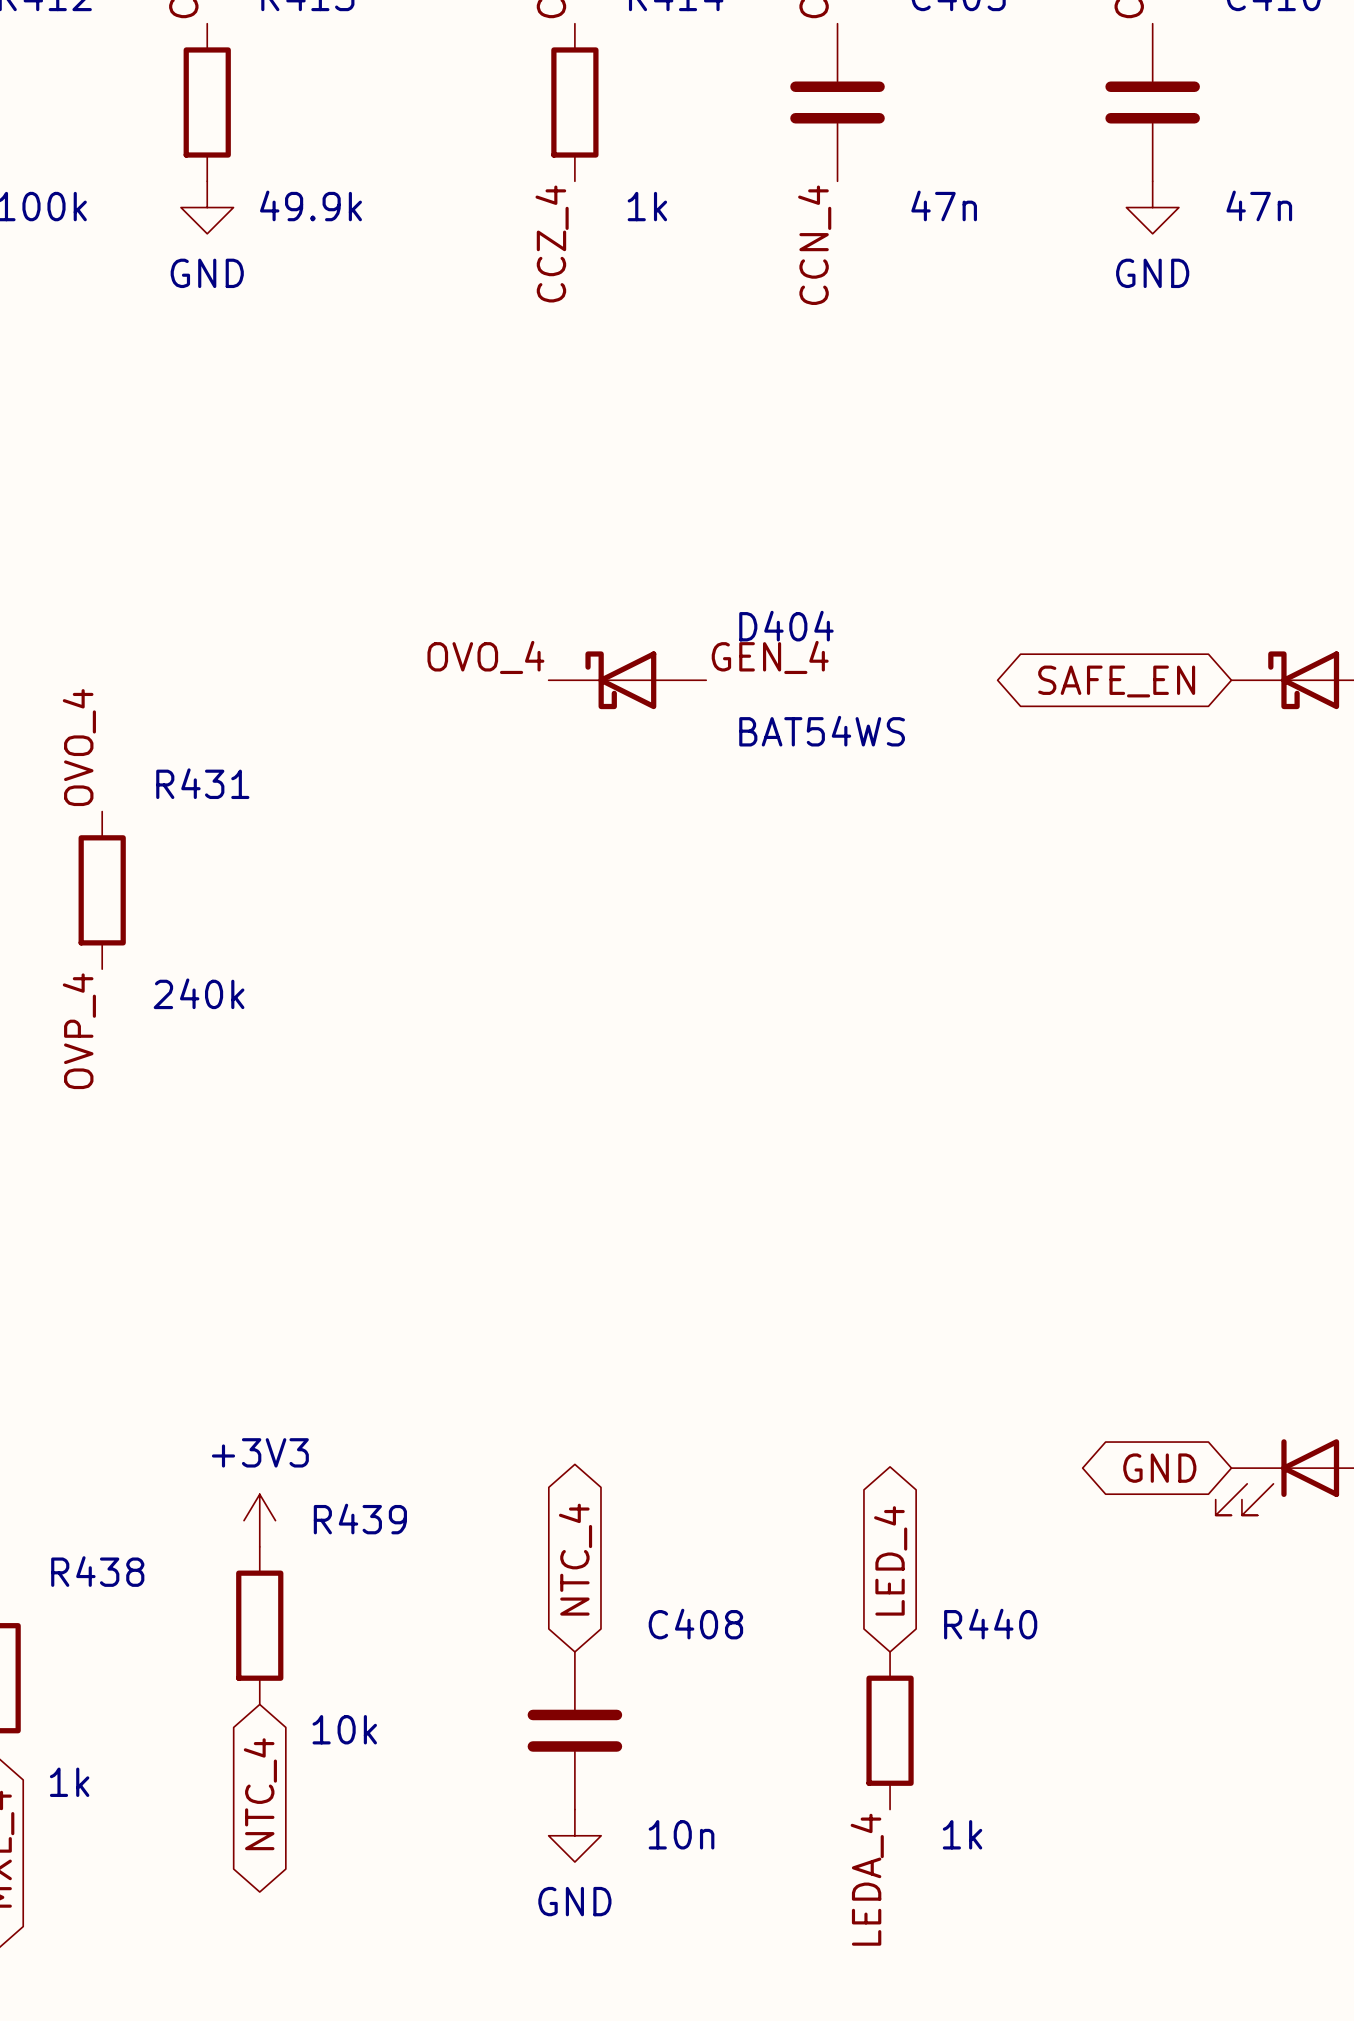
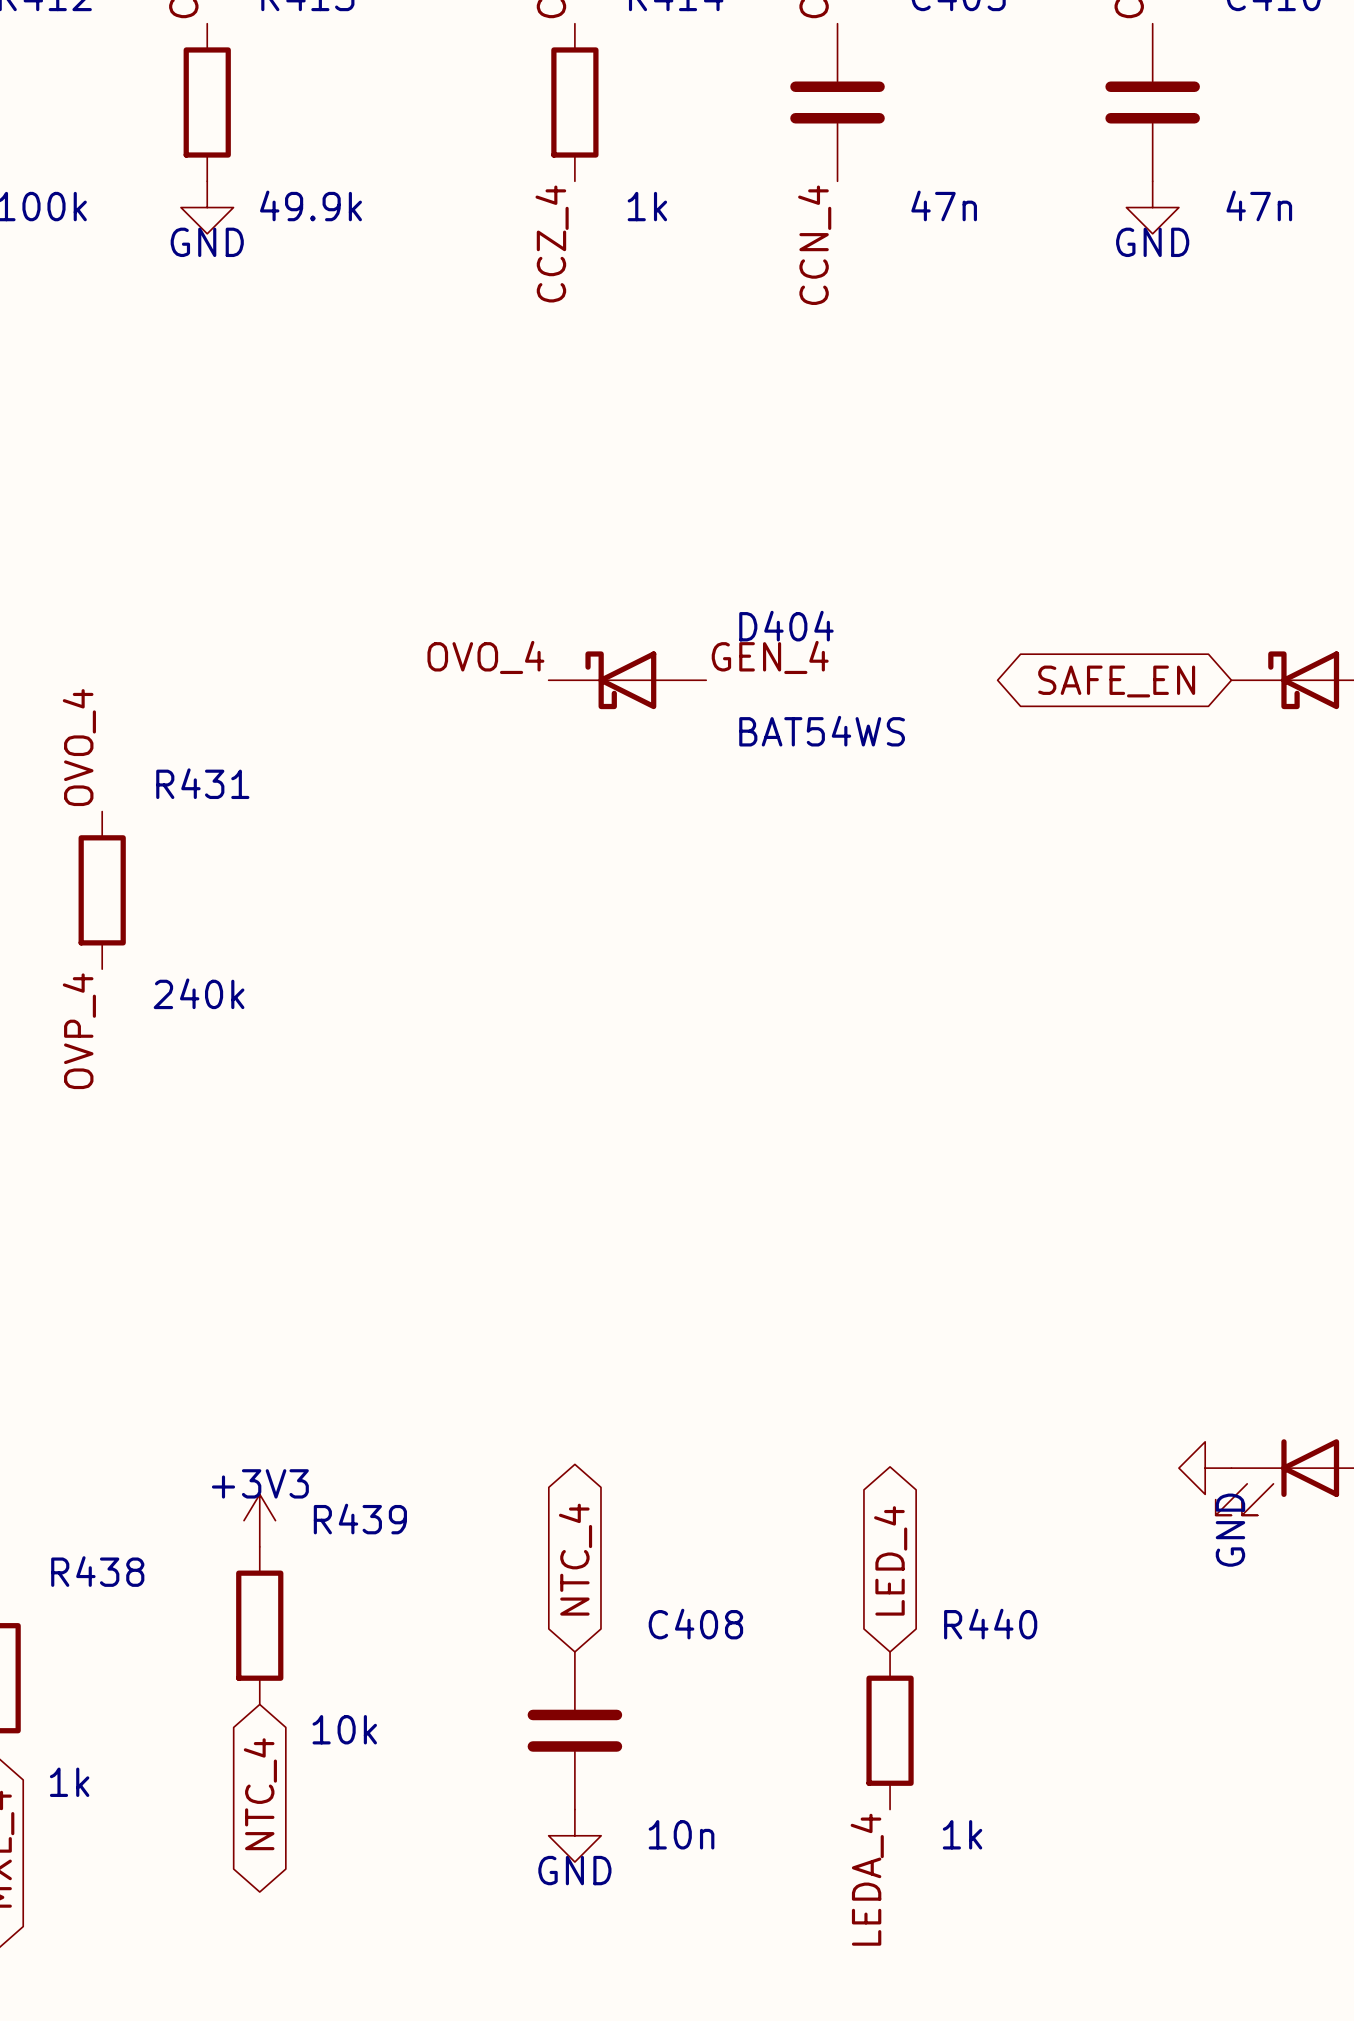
power symbol text position: GND (207, 273) -> GND (207, 242)
power symbol text position: GND (1152, 273) -> GND (1152, 242)
power symbol text position: +3V3 (260, 1452) -> +3V3 (260, 1483)
global label: GND (1159, 1468) -> none
power symbol: none -> GND (1205, 1468)
power symbol text position: GND (574, 1901) -> GND (574, 1870)

